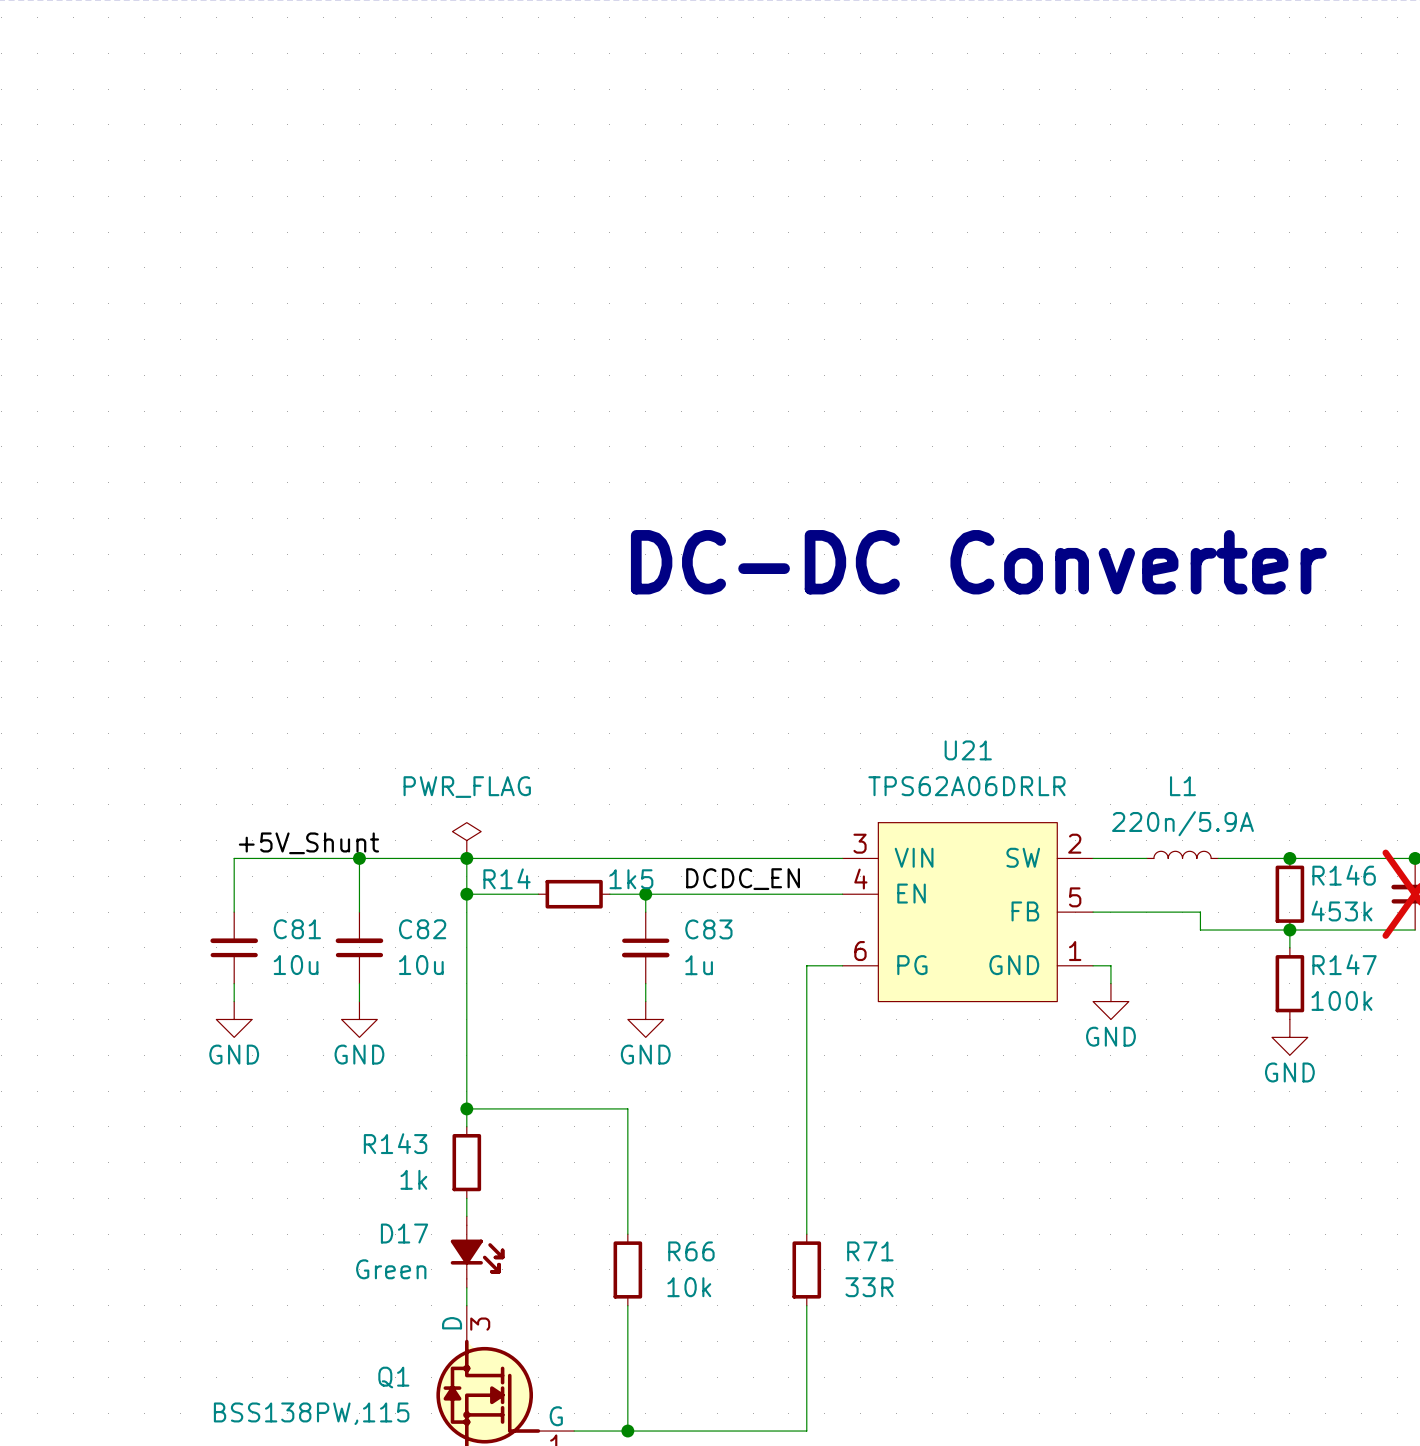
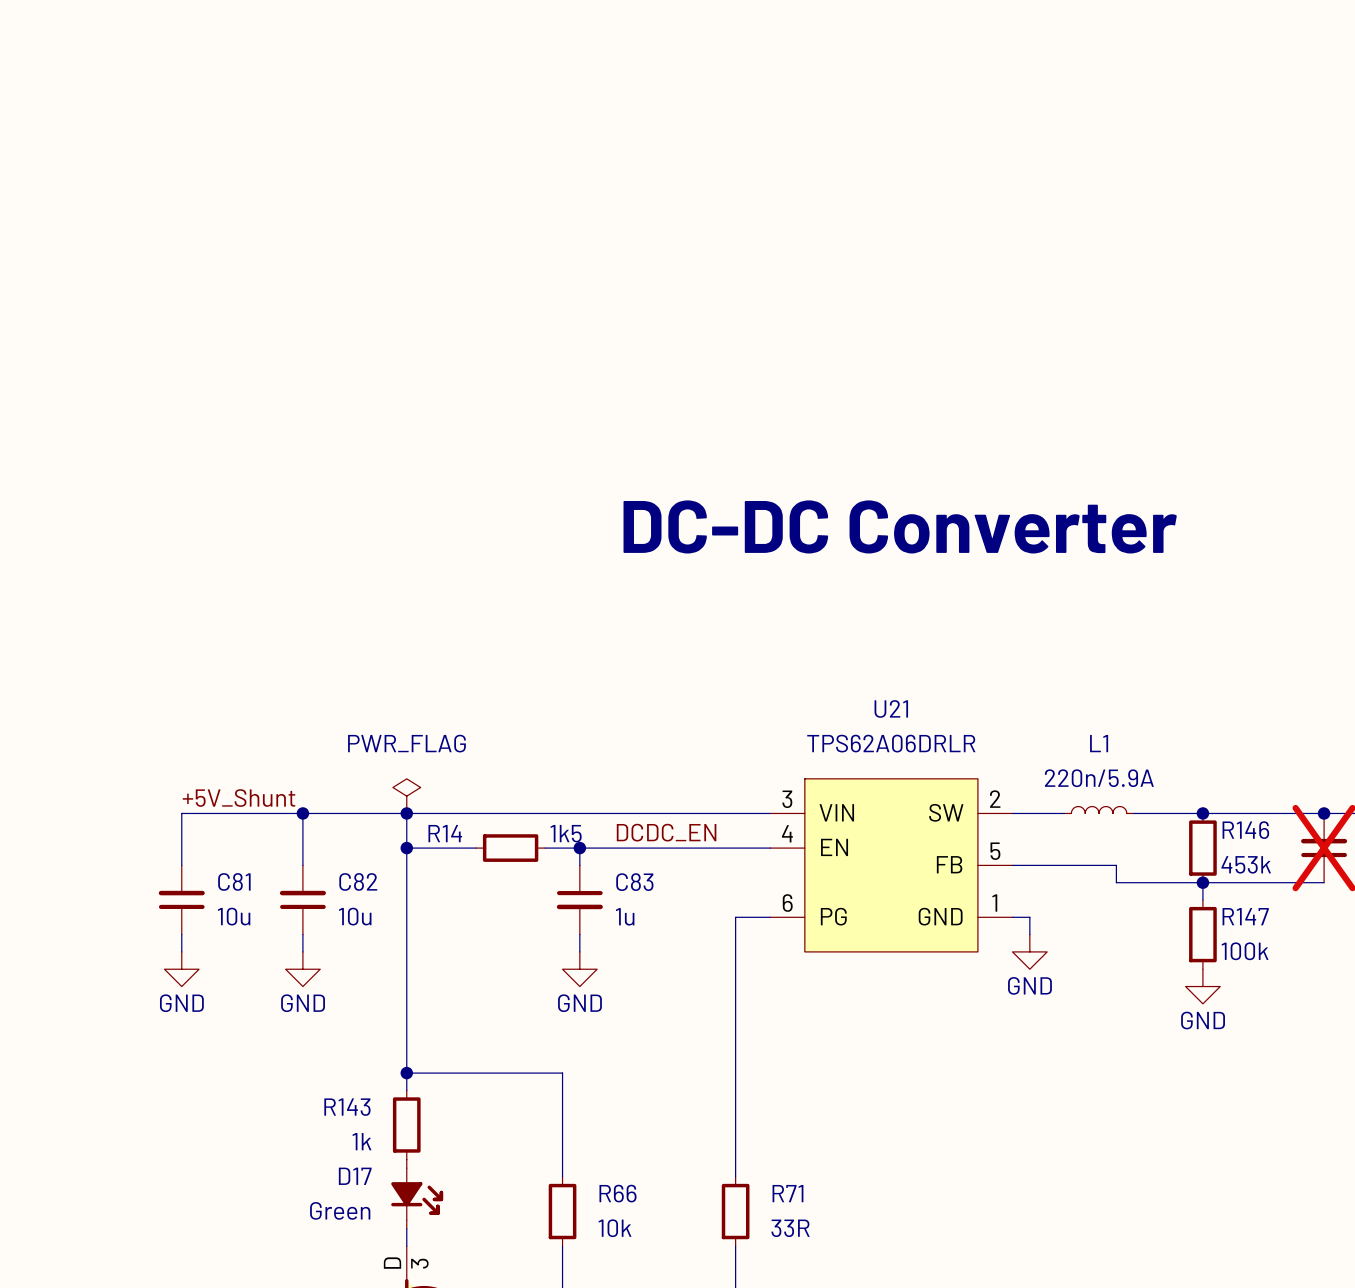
wire: (466, 1108) (627, 1108) (627, 1126) -> (406, 1090) (406, 1073) (562, 1073)
junction position: (466, 1108) -> (406, 1073)
R143 position: (466, 1162) -> (406, 1125)

